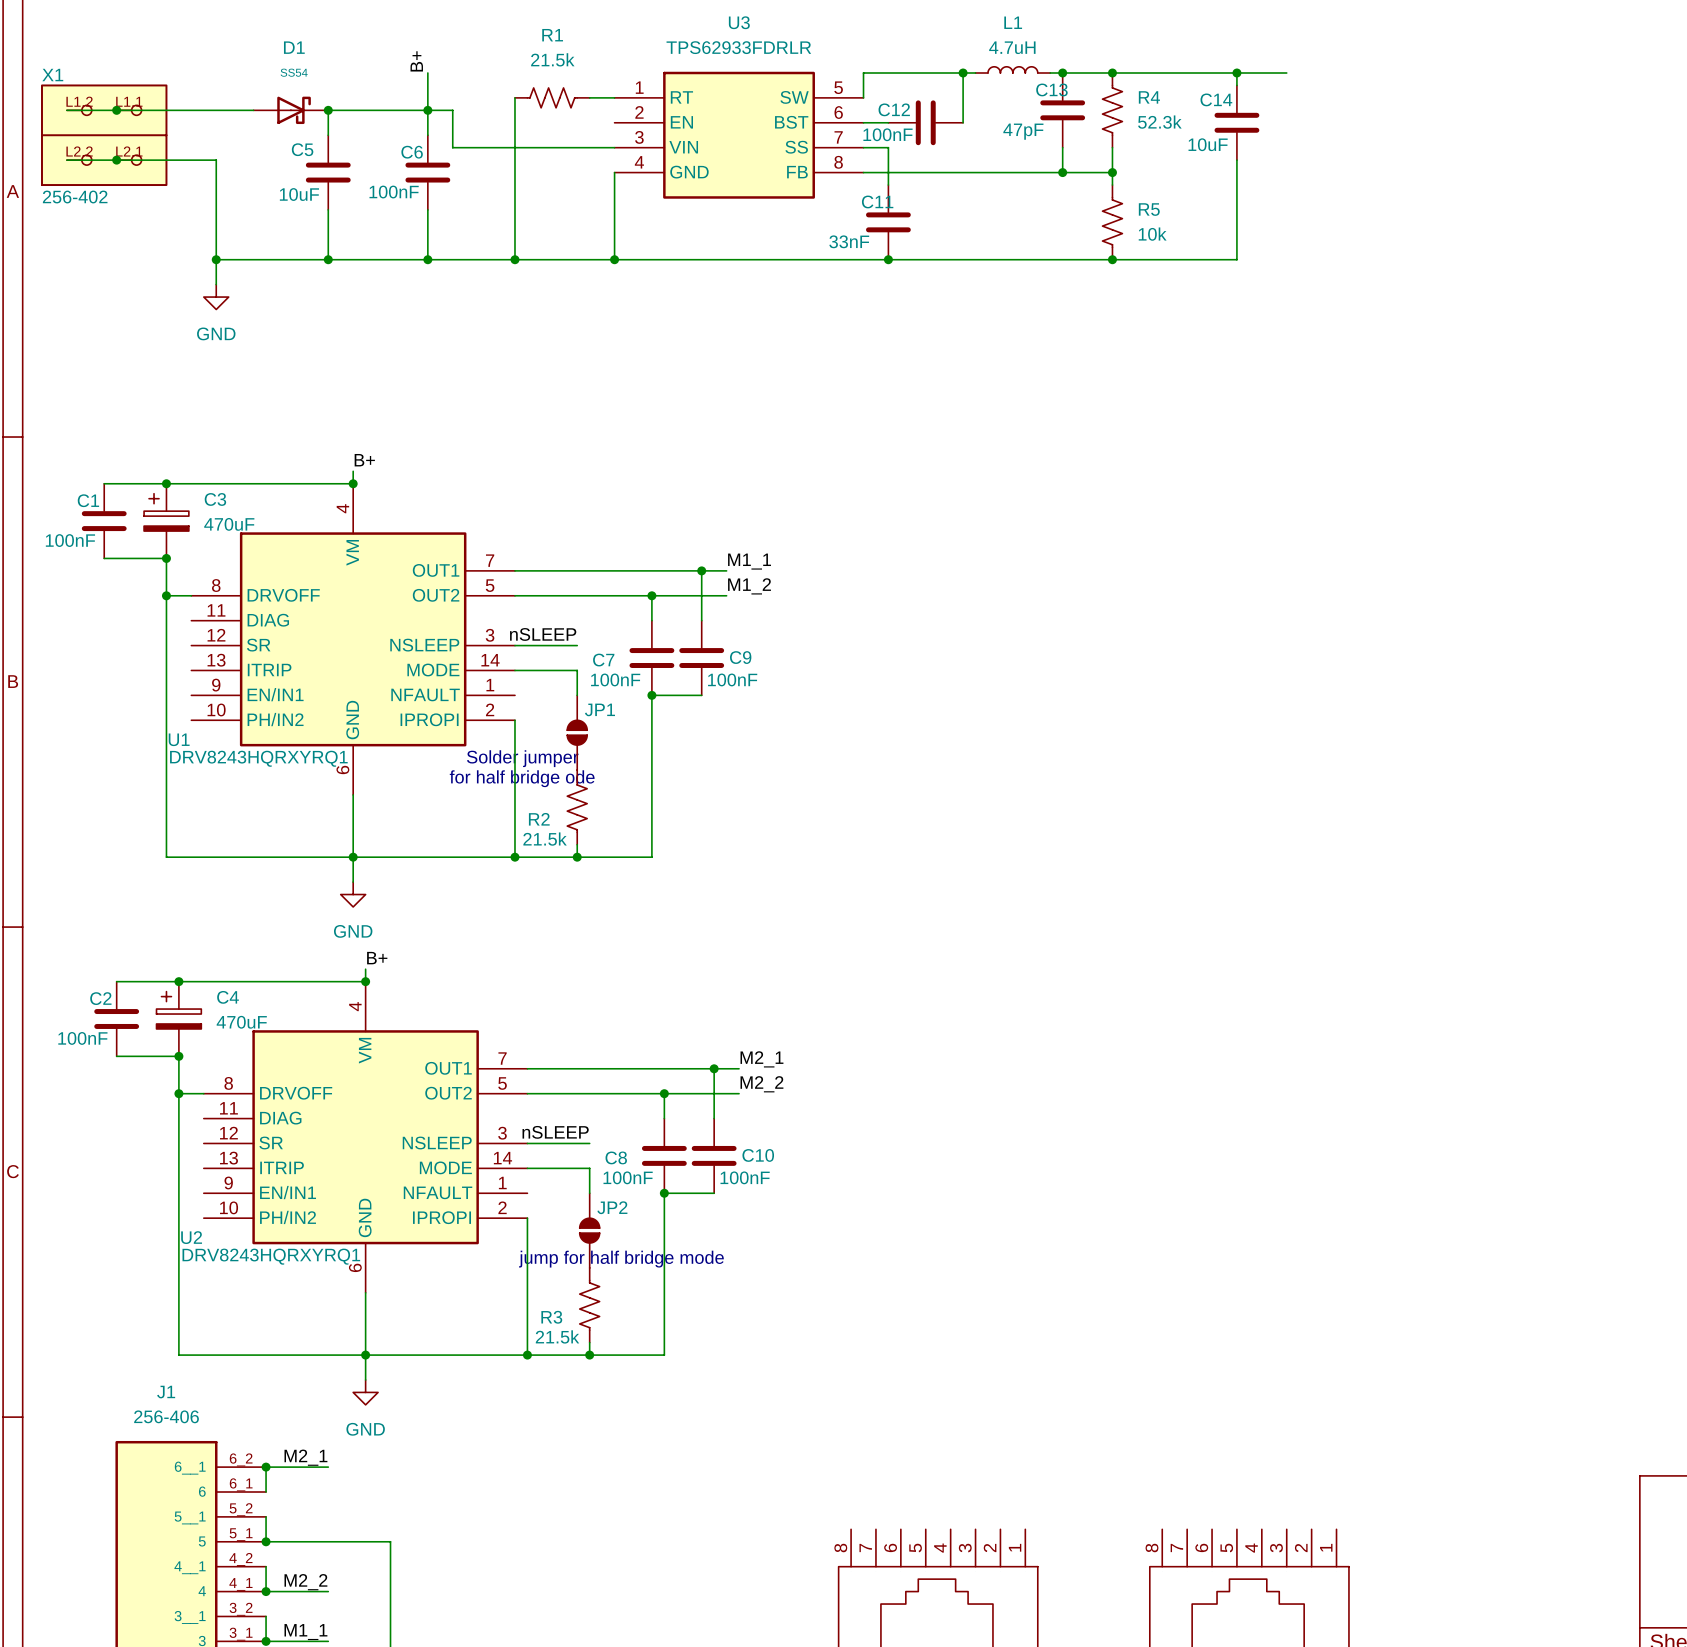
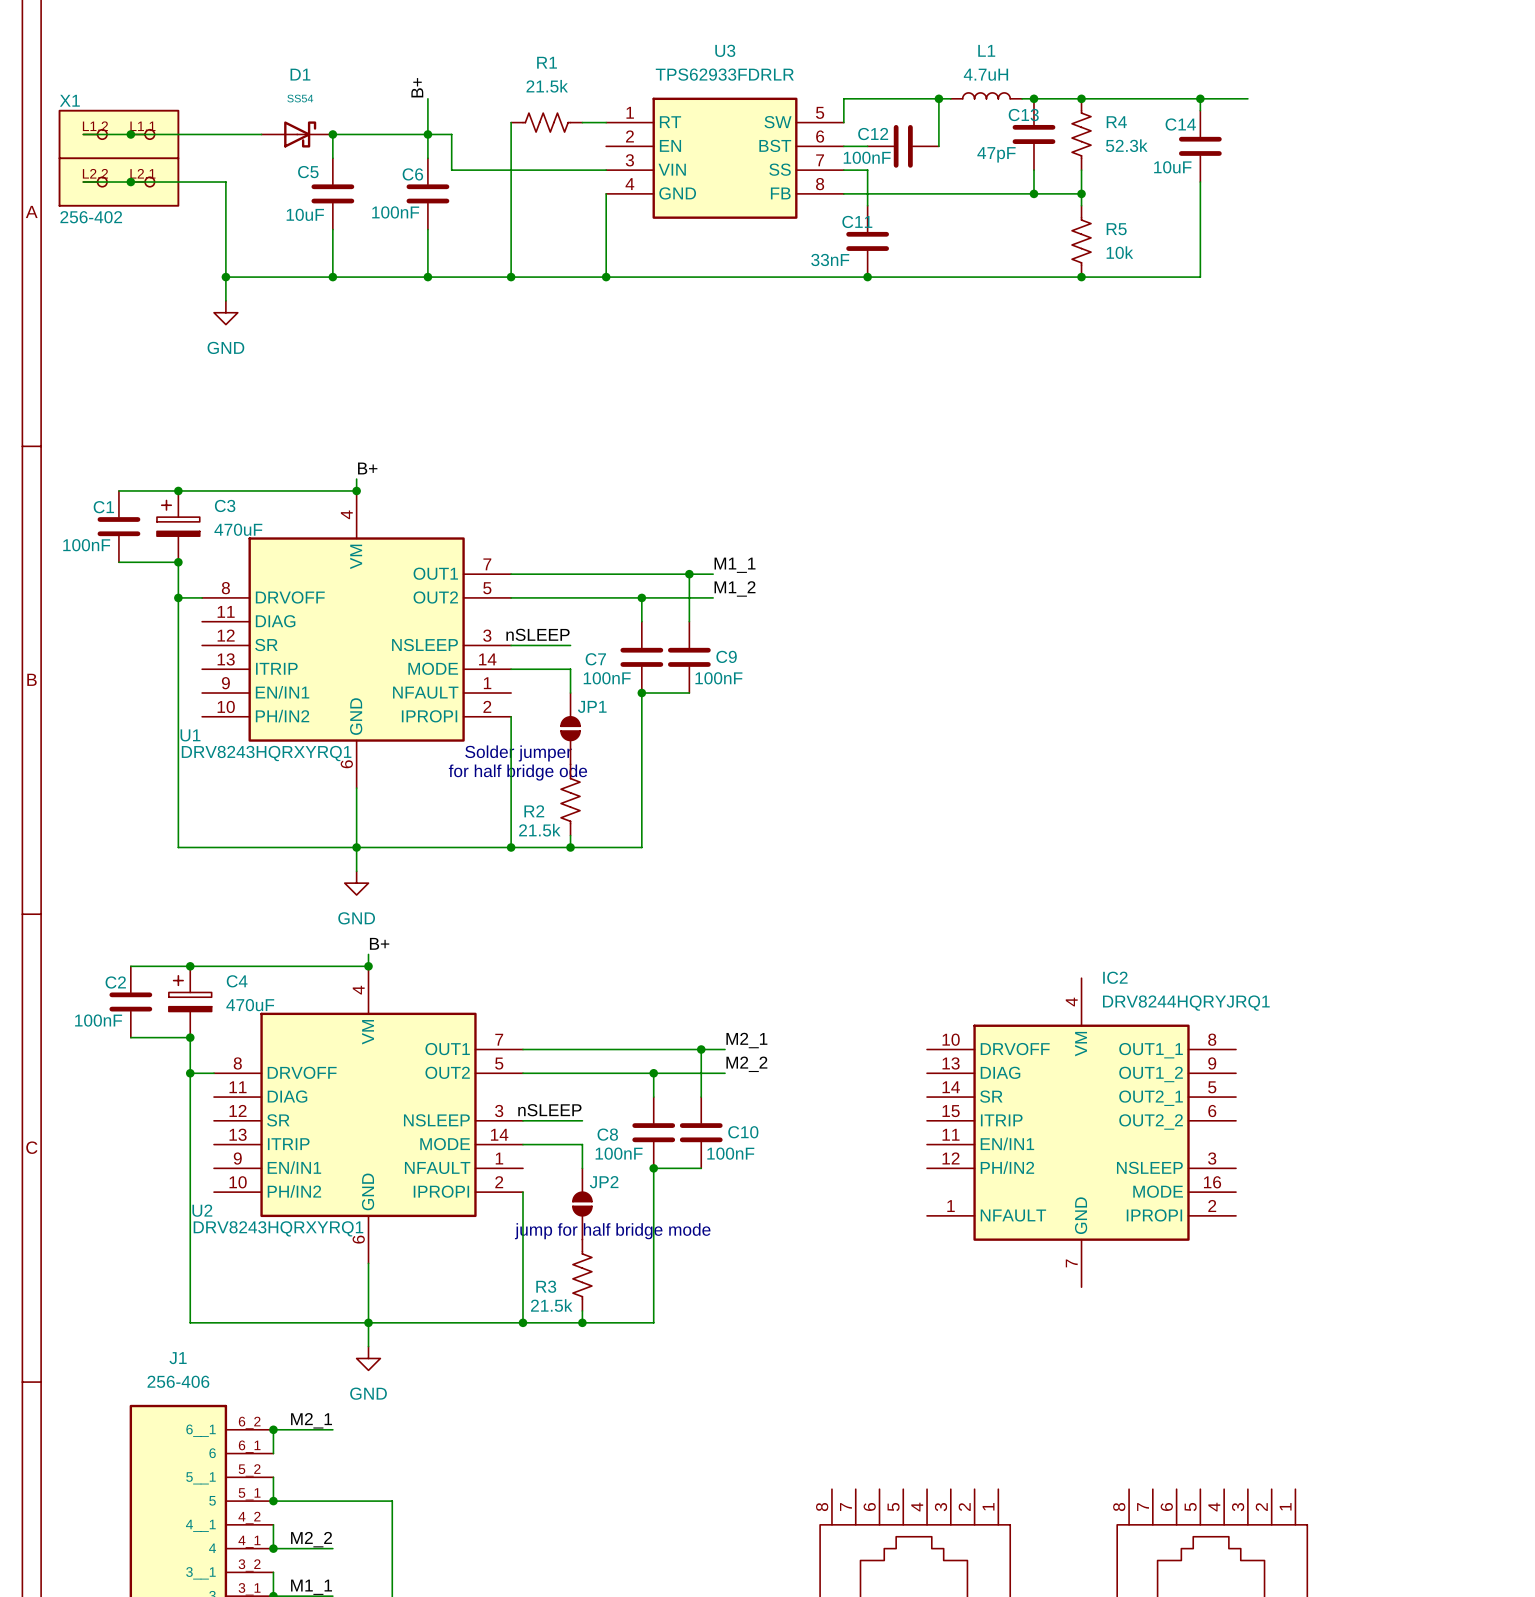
IC2: none -> DRV8244HQRYJRQ1 (1081, 1132)

